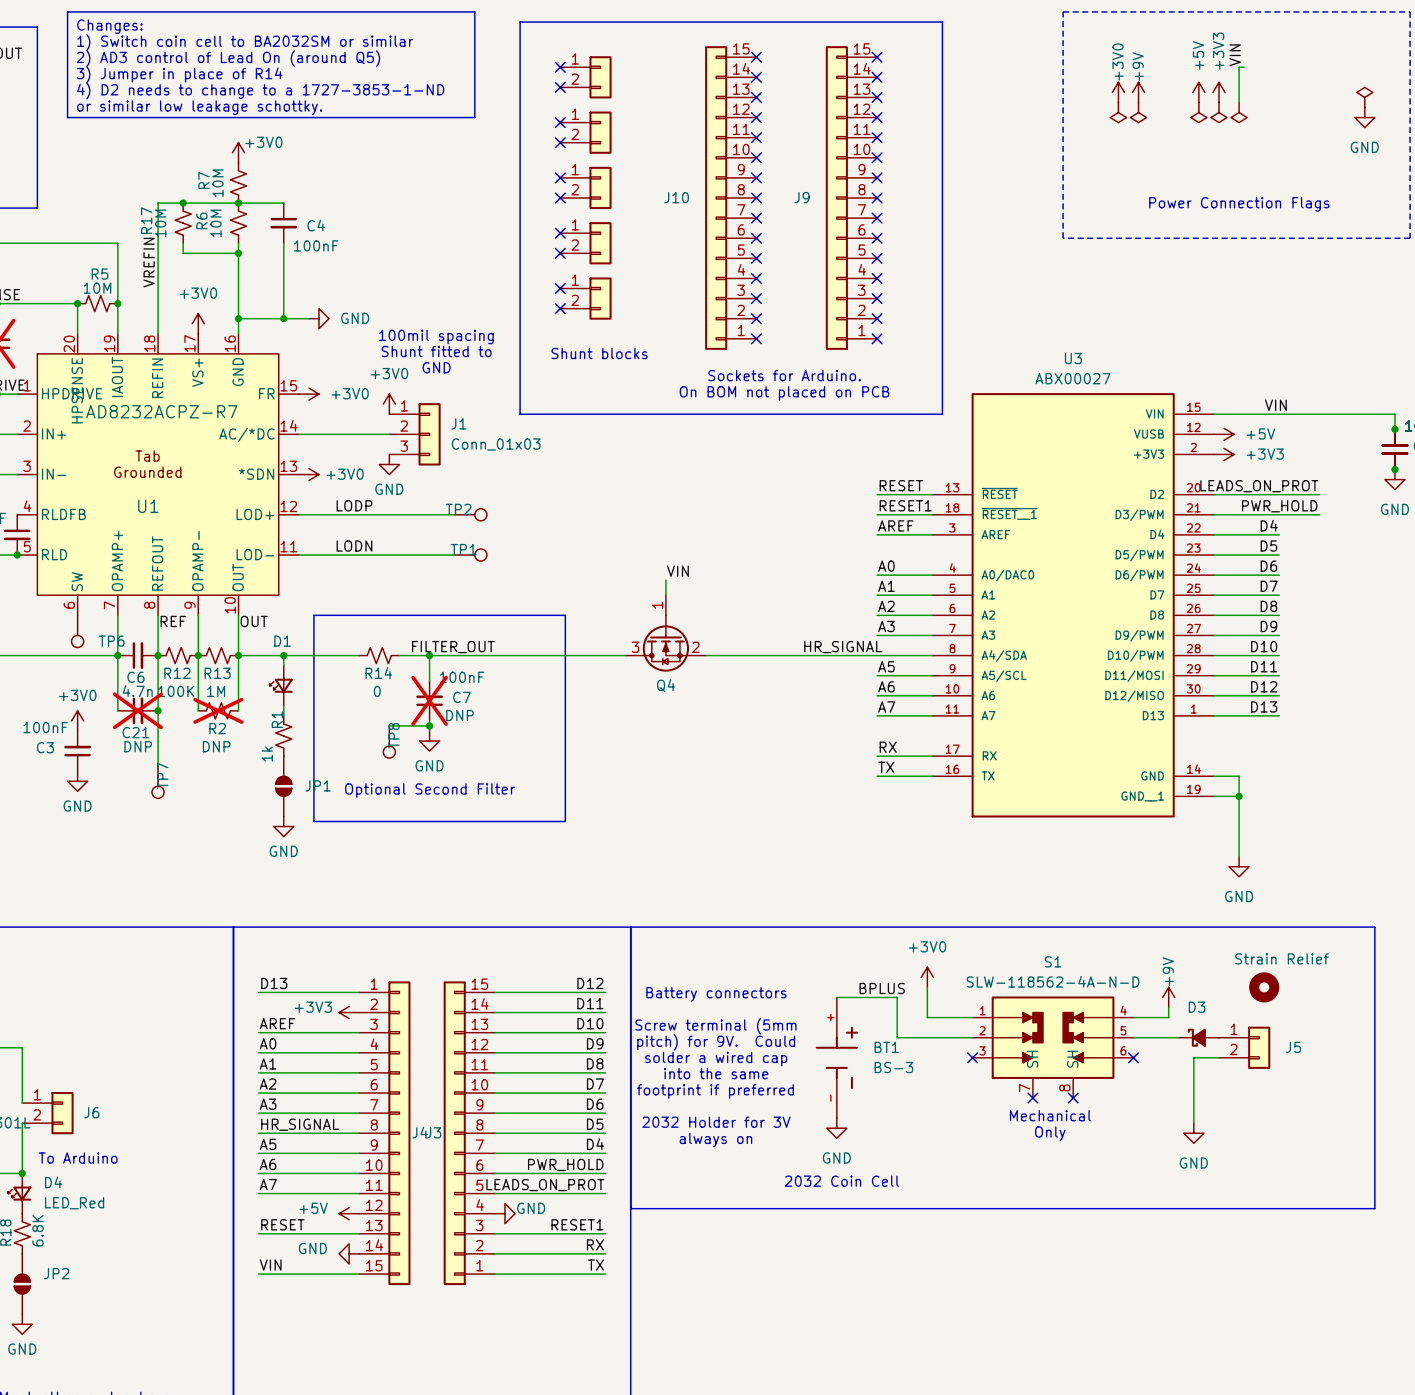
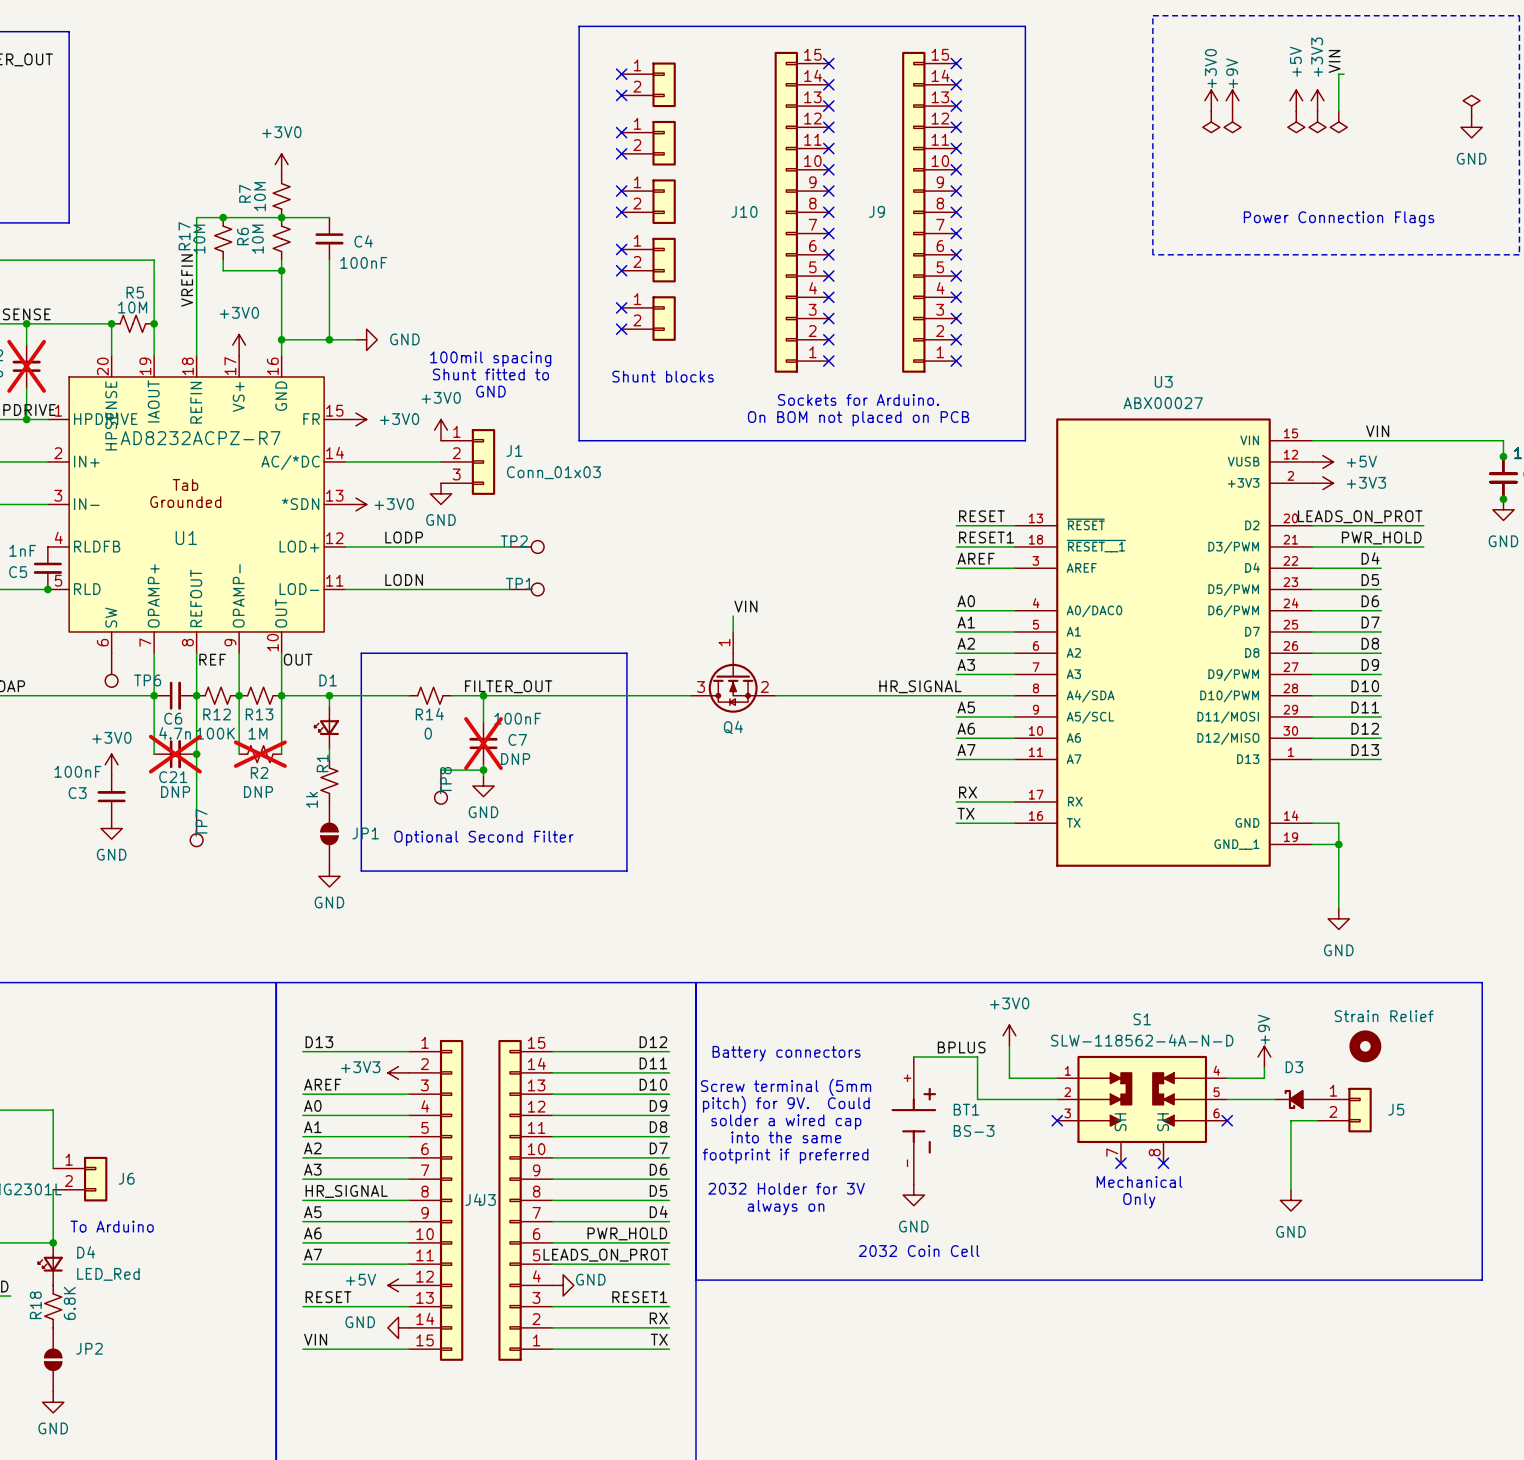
line: (67, 11) (474, 11) (474, 117) (67, 117) (67, 11) -> none
text: Changes: (109, 26) -> none
text: 1) Switch coin cell to BA2032SM or similar (245, 42) -> none
text: 2) AD3 control of Lead On (around Q5) (228, 58) -> none
text: 3) Jumper in place of R14 (179, 74) -> none
text: 4) D2 needs to change to a 1727-3853-1-ND (260, 90) -> none
text: or similar low leakage schottky. (199, 107) -> none
power symbol text position: +3V0 (263, 142) -> +3V0 (281, 132)

